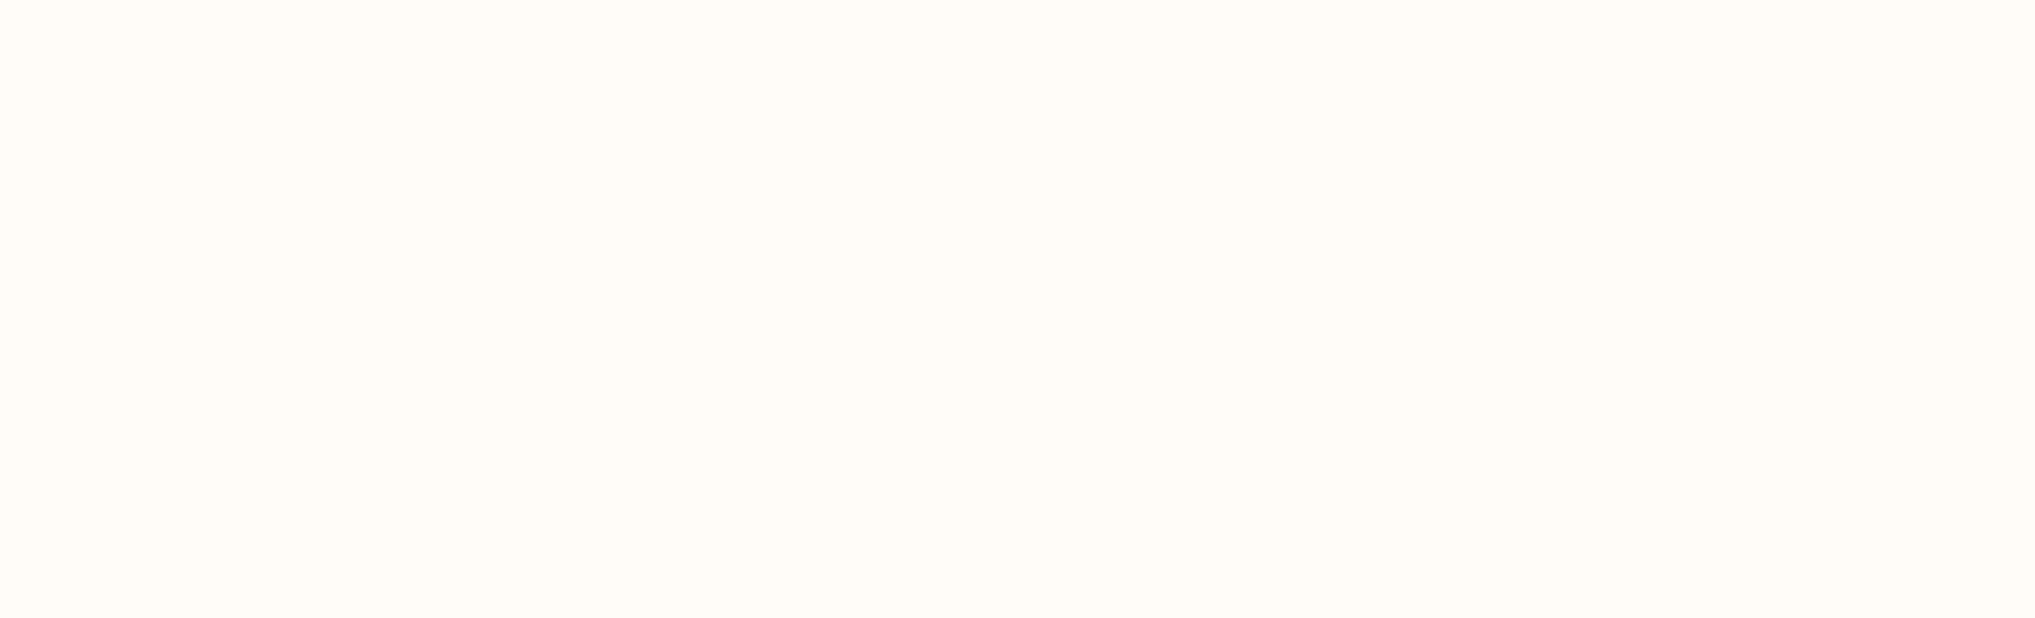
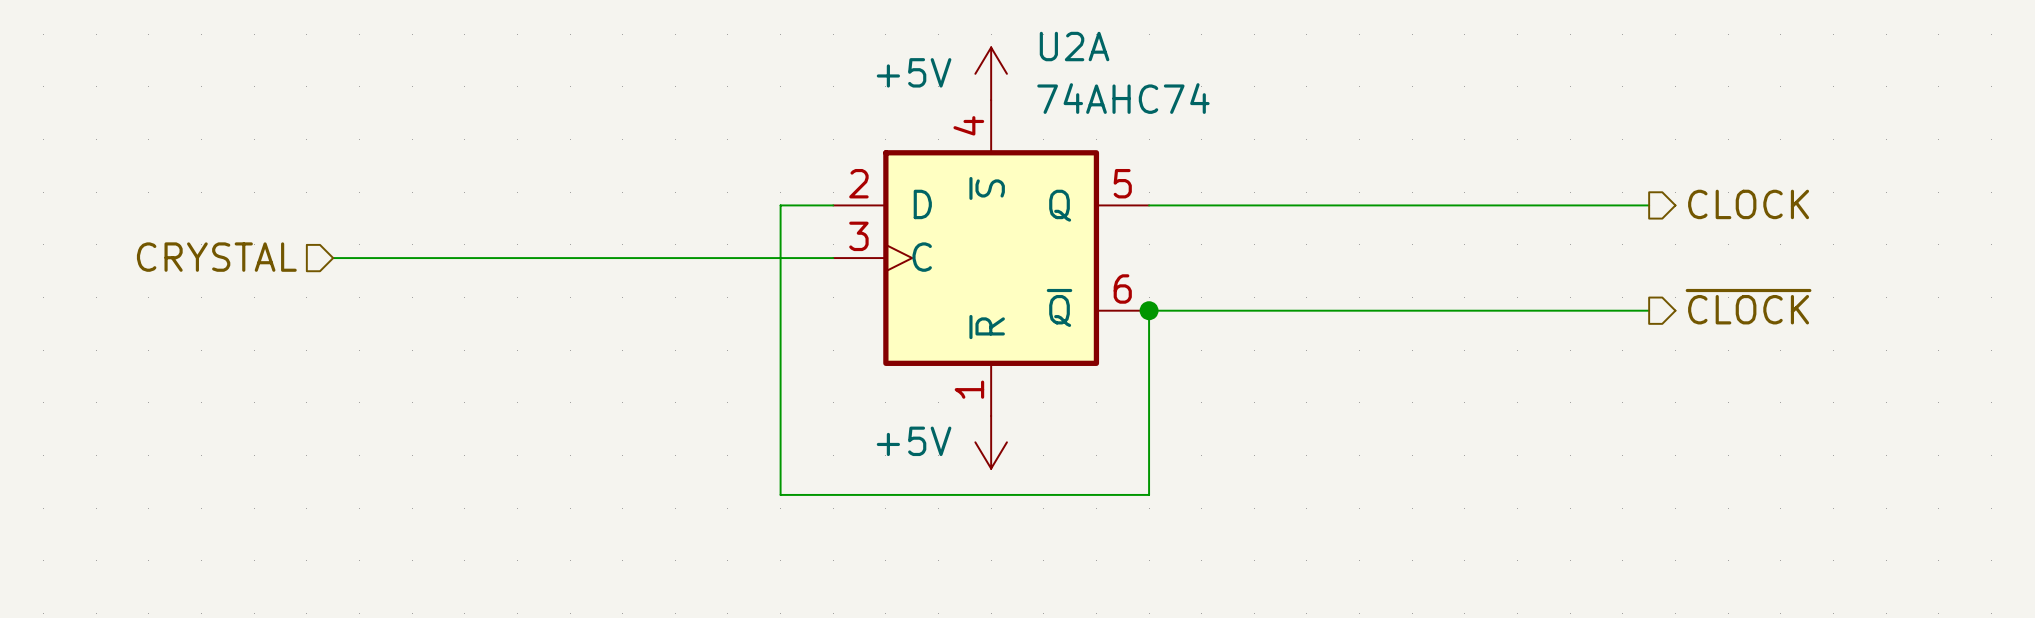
power symbol: none -> +5V (991, 73)
hierarchical label: none -> CLOCK (1748, 204)
wire: none -> (833, 205) (780, 205) (780, 494) (1149, 494) (1149, 310) (1649, 310)
wire: none -> (1149, 205) (1649, 205)
hierarchical label: none -> CRYSTAL (216, 257)
wire: none -> (333, 258) (833, 258)
U2A: none -> 74AHC74 (991, 258)
hierarchical label: none -> ~{CLOCK} (1748, 306)
junction: none -> (1149, 310)
power symbol: none -> +5V (991, 442)

